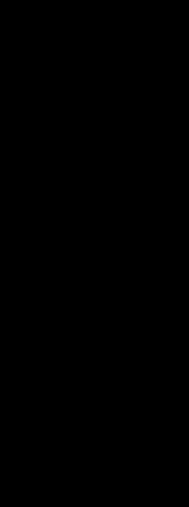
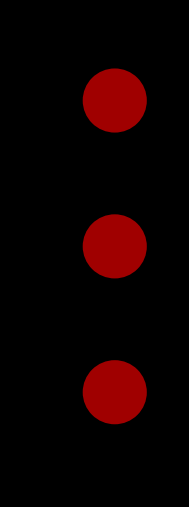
part: none -> (114, 100)
part: none -> (114, 246)
part: none -> (114, 392)

